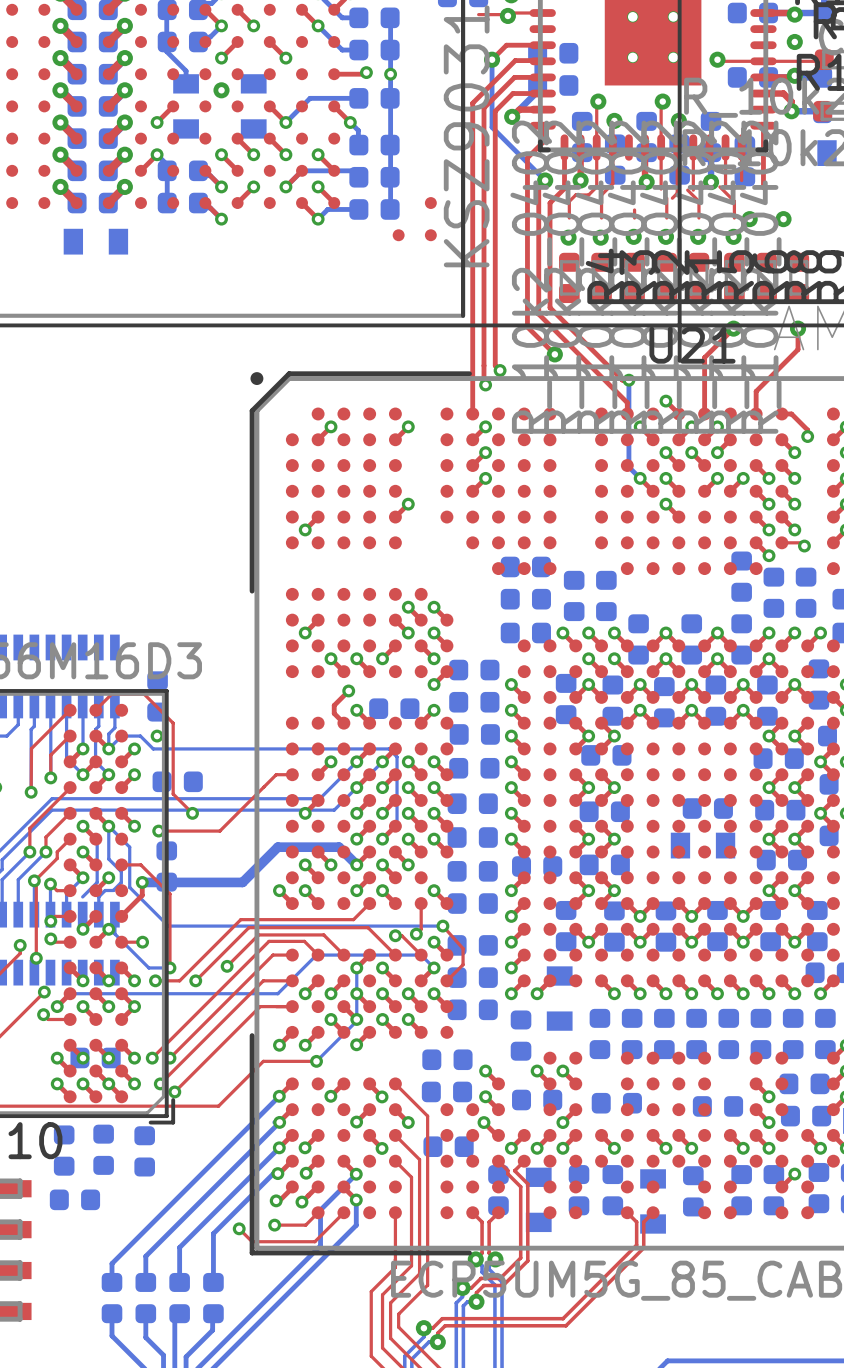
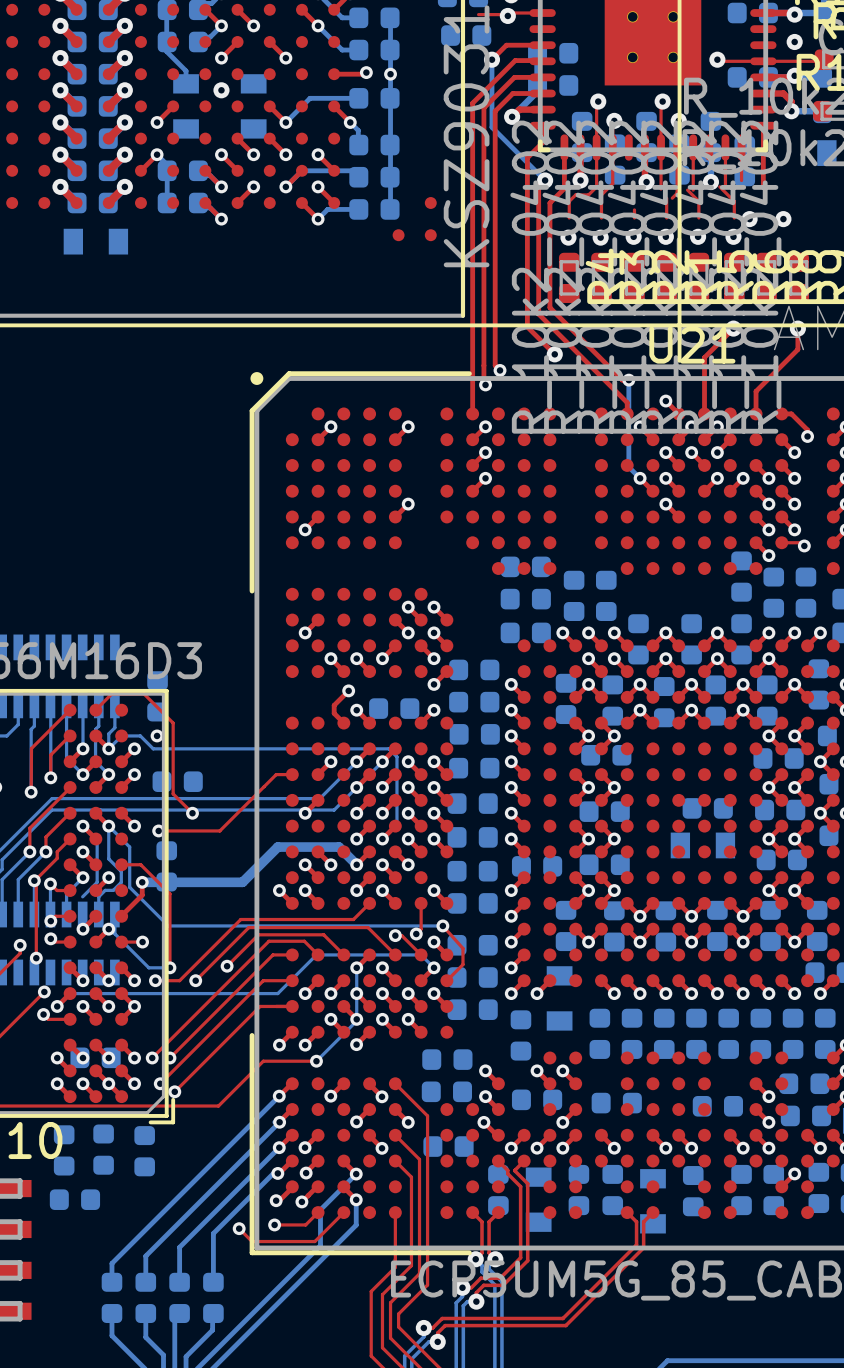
part: none -> (466, 35)

